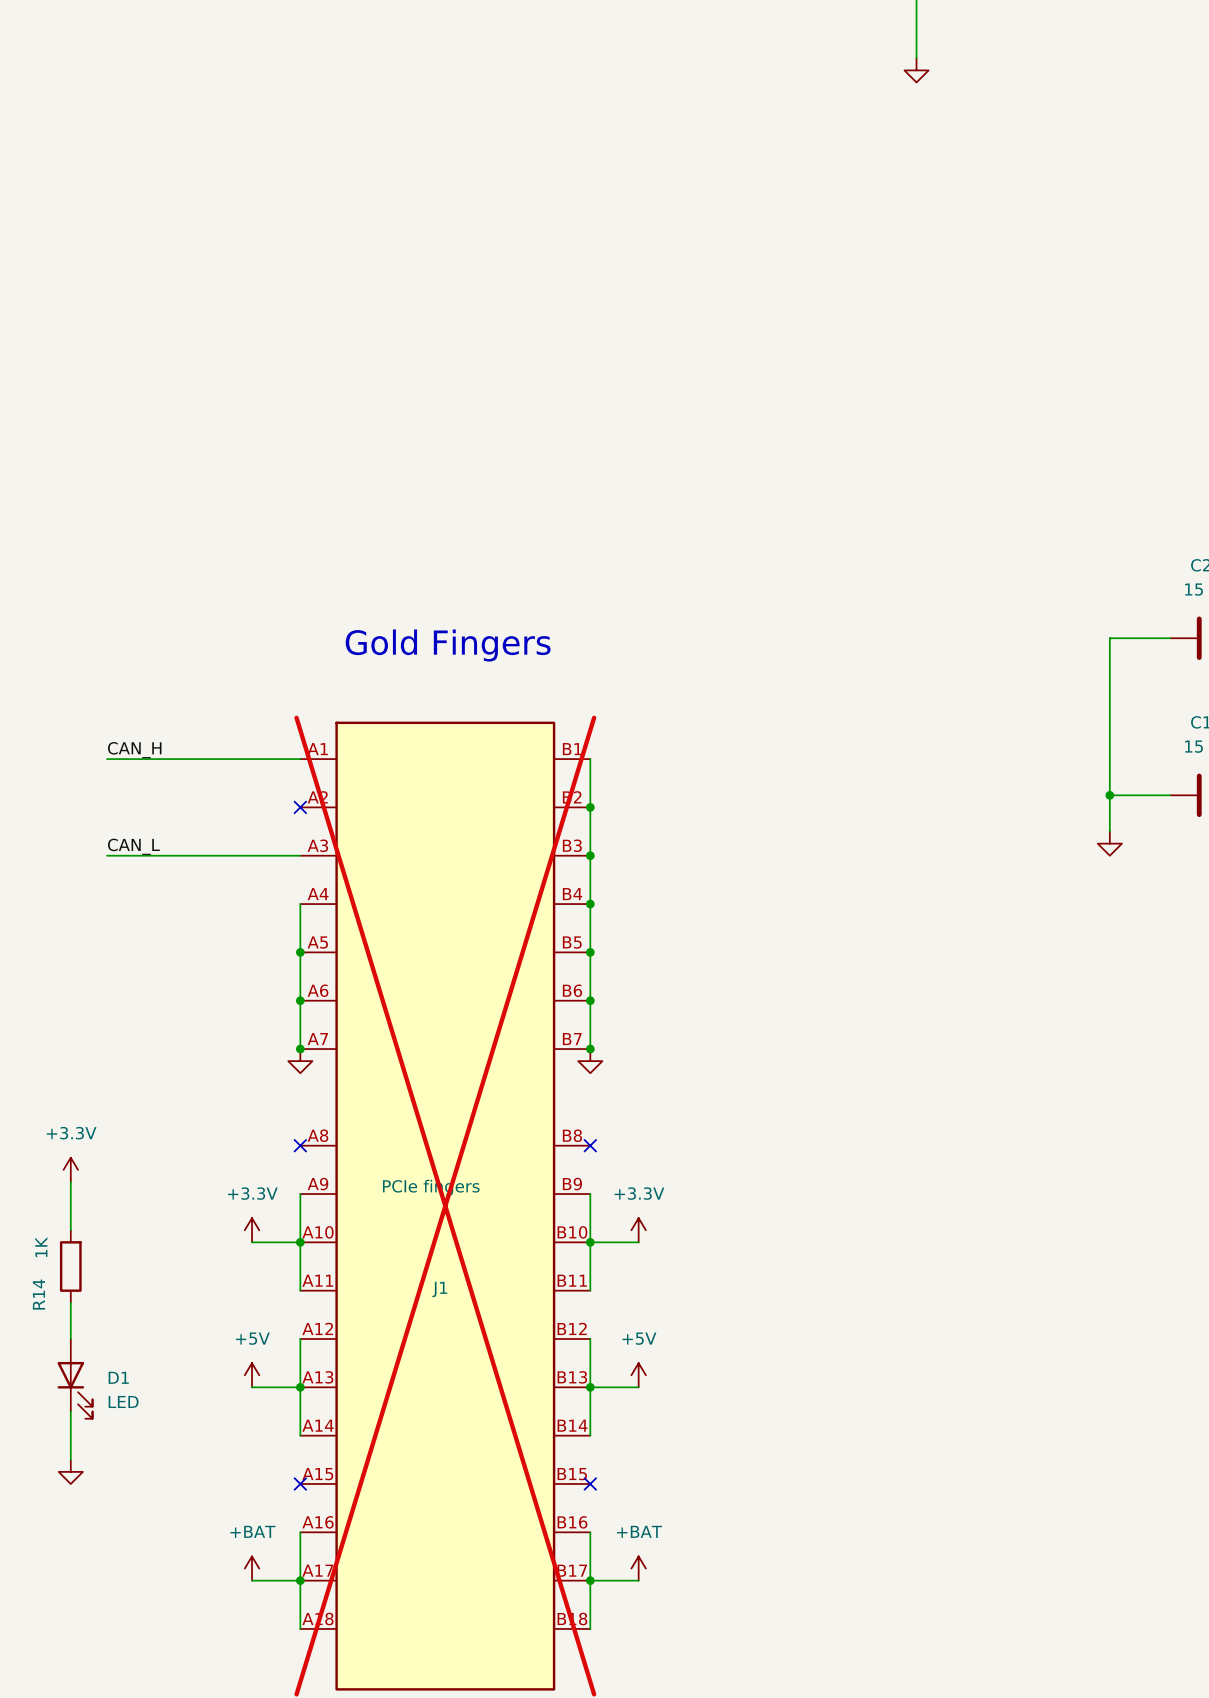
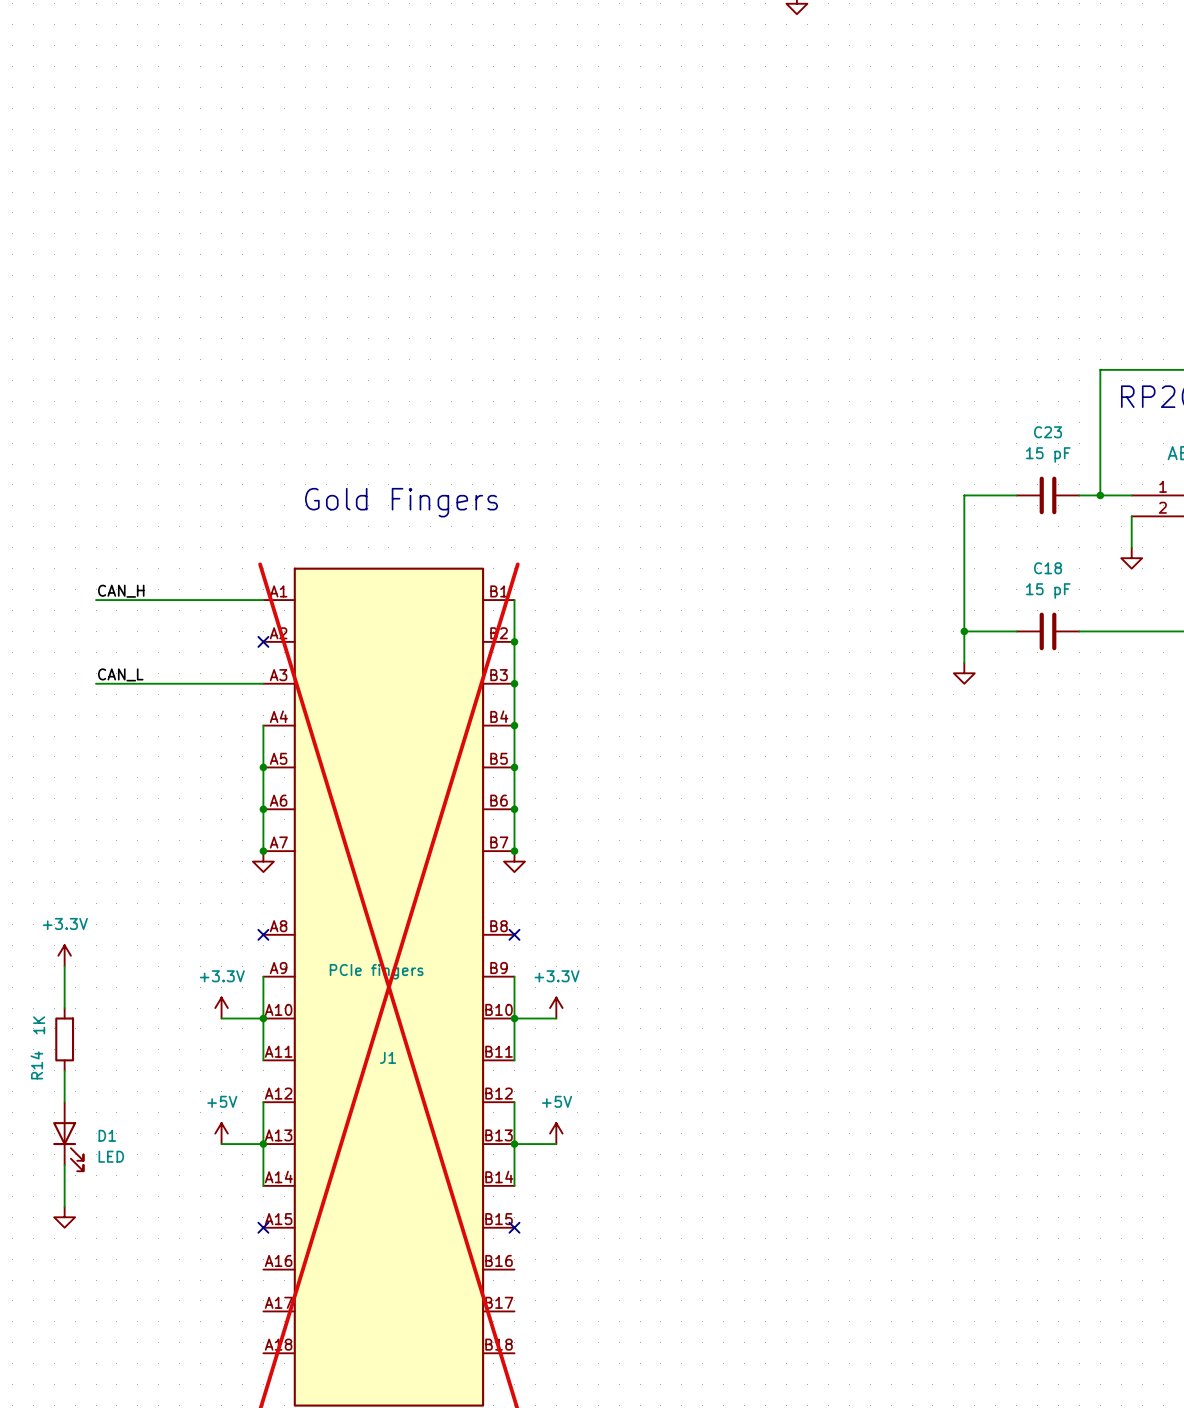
wire: (300, 1532) (300, 1628) -> none
wire: (590, 1532) (590, 1628) -> none
power symbol: +BAT (252, 1568) -> none
power symbol: +BAT (638, 1568) -> none
wire: (252, 1580) (300, 1580) -> none
junction: (300, 1580) -> none
wire: (590, 1580) (638, 1580) -> none
junction: (590, 1580) -> none

